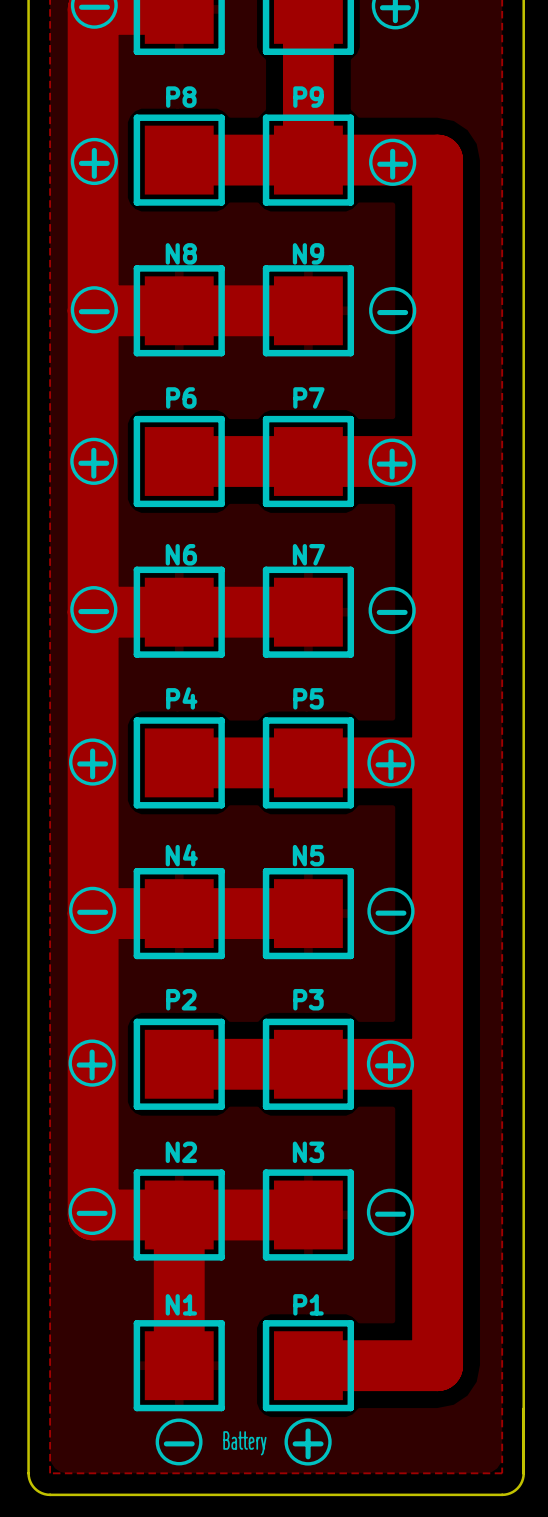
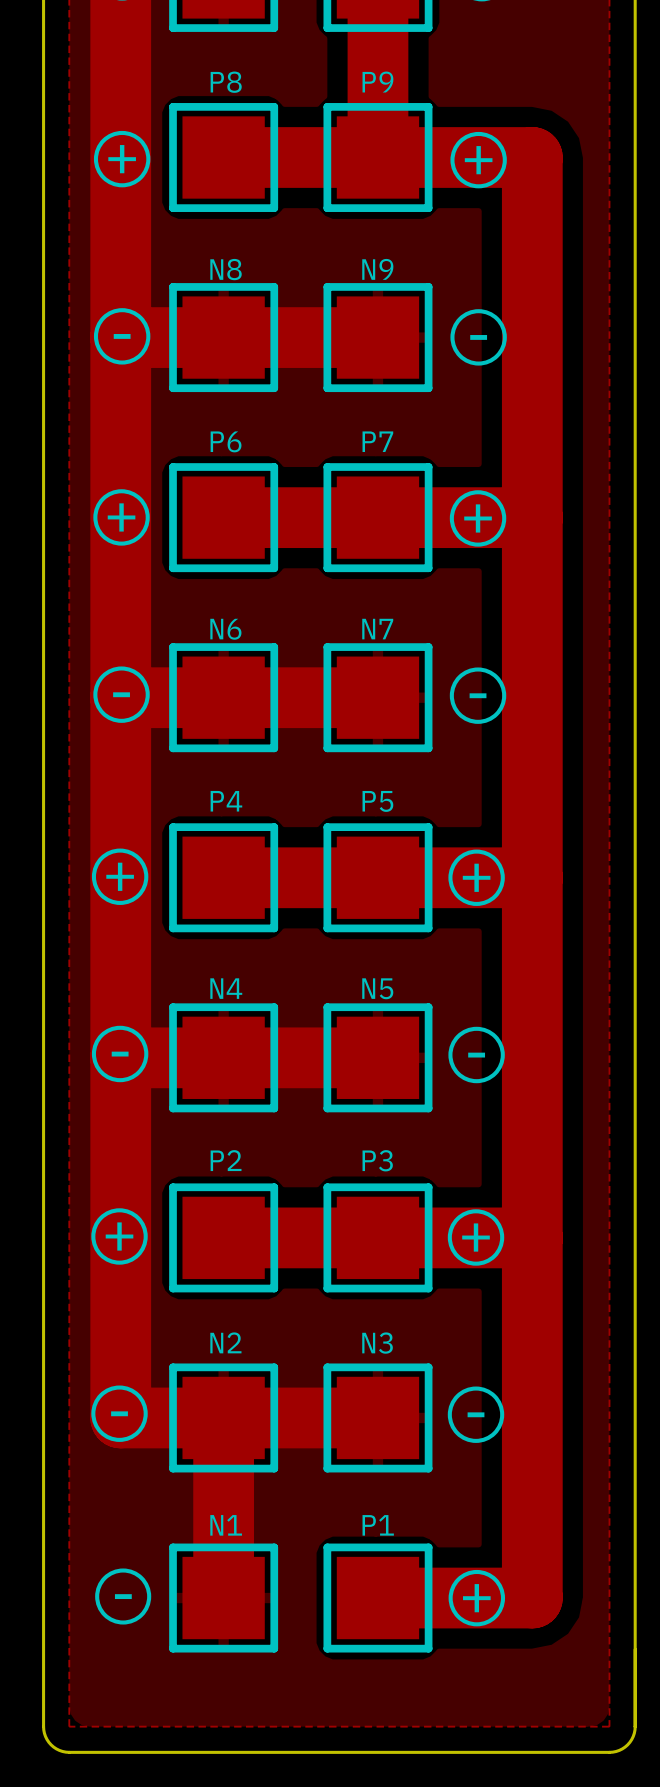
drawing position: (179, 1441) -> (123, 1596)
drawing position: (308, 1441) -> (476, 1598)
text position: - (179, 1443) -> - (123, 1596)
text: Battery (244, 1443) -> none
text position: + (308, 1443) -> + (476, 1598)

